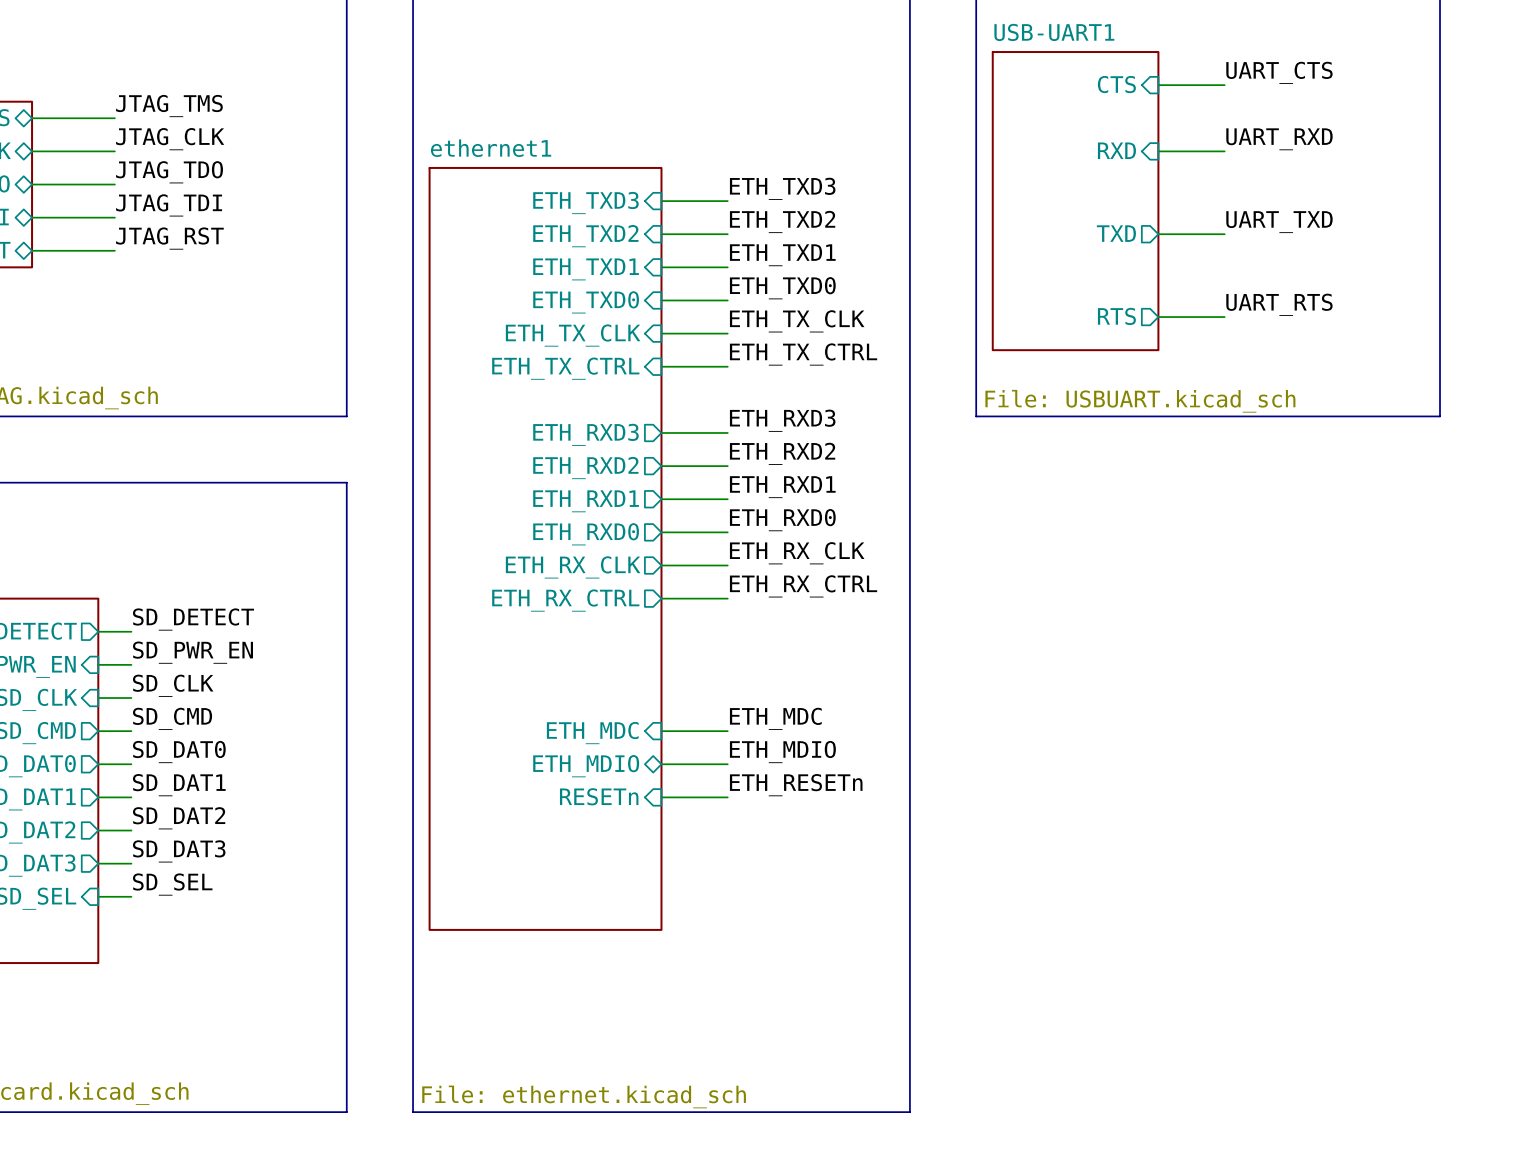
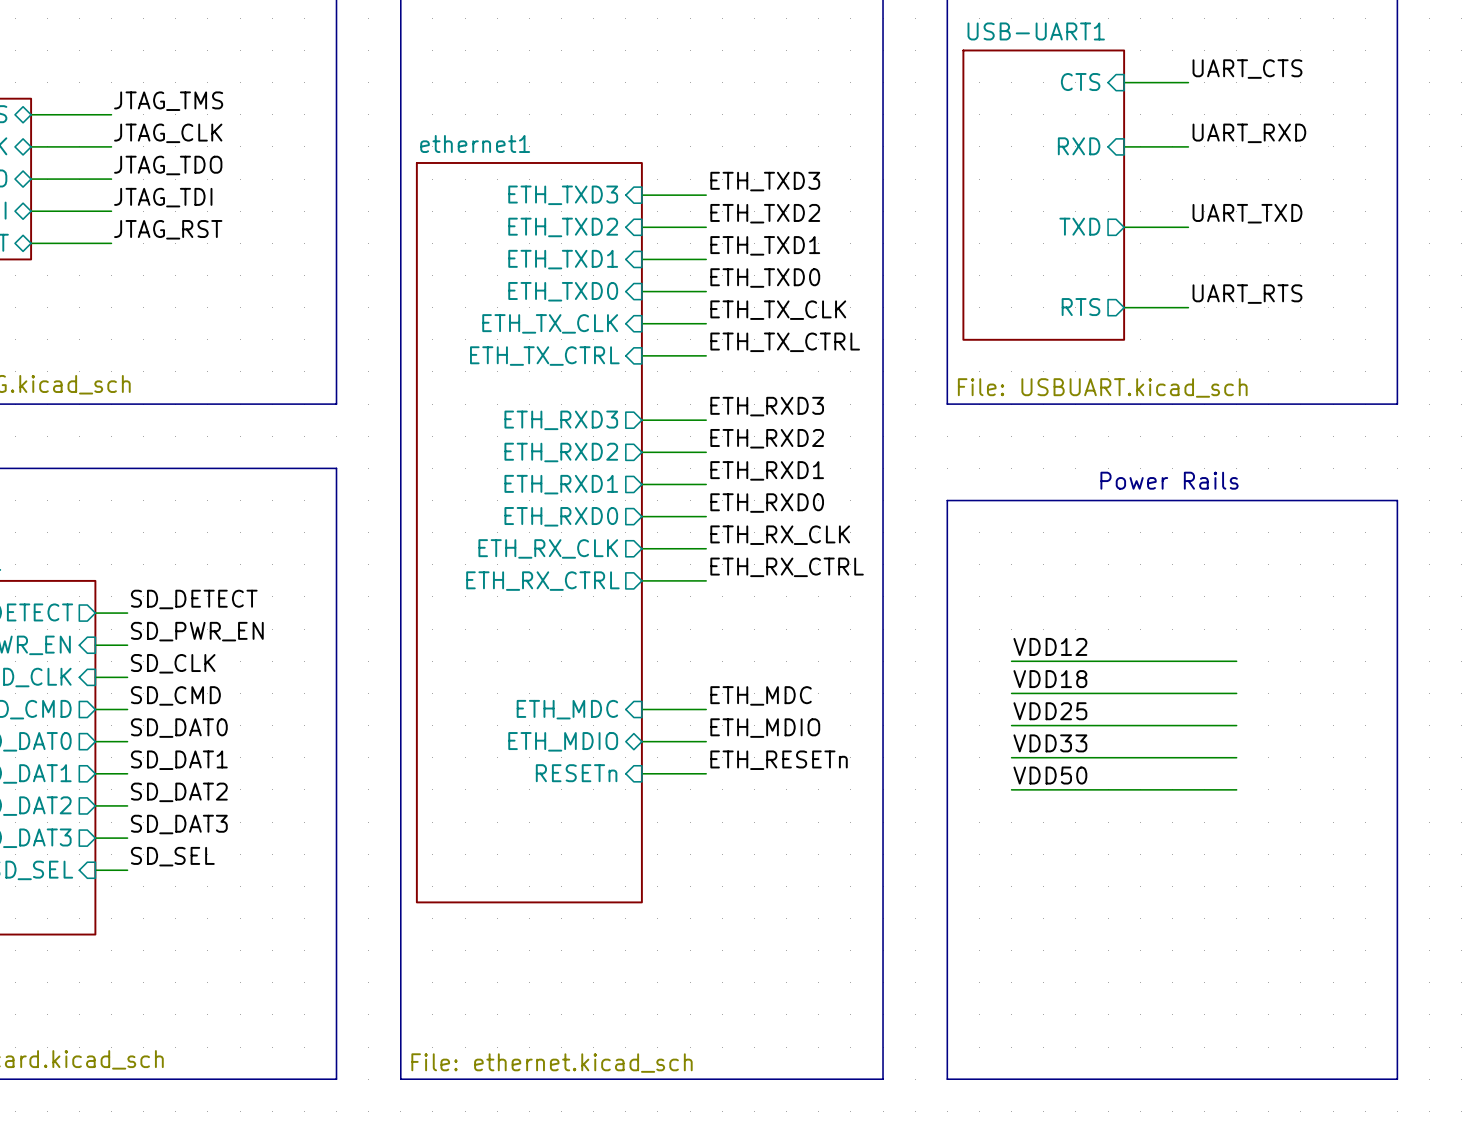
text: none -> Power Rails (1169, 480)
line: none -> (947, 500) (1397, 500) (1397, 1079) (947, 1079) (947, 500)
label: none -> VDD12 (1050, 646)
wire: none -> (1011, 661) (1236, 661)
label: none -> VDD18 (1050, 679)
wire: none -> (1011, 693) (1236, 693)
label: none -> VDD25 (1050, 711)
wire: none -> (1011, 725) (1236, 725)
label: none -> VDD33 (1050, 743)
wire: none -> (1011, 757) (1236, 757)
label: none -> VDD50 (1050, 775)
wire: none -> (1011, 789) (1236, 789)

